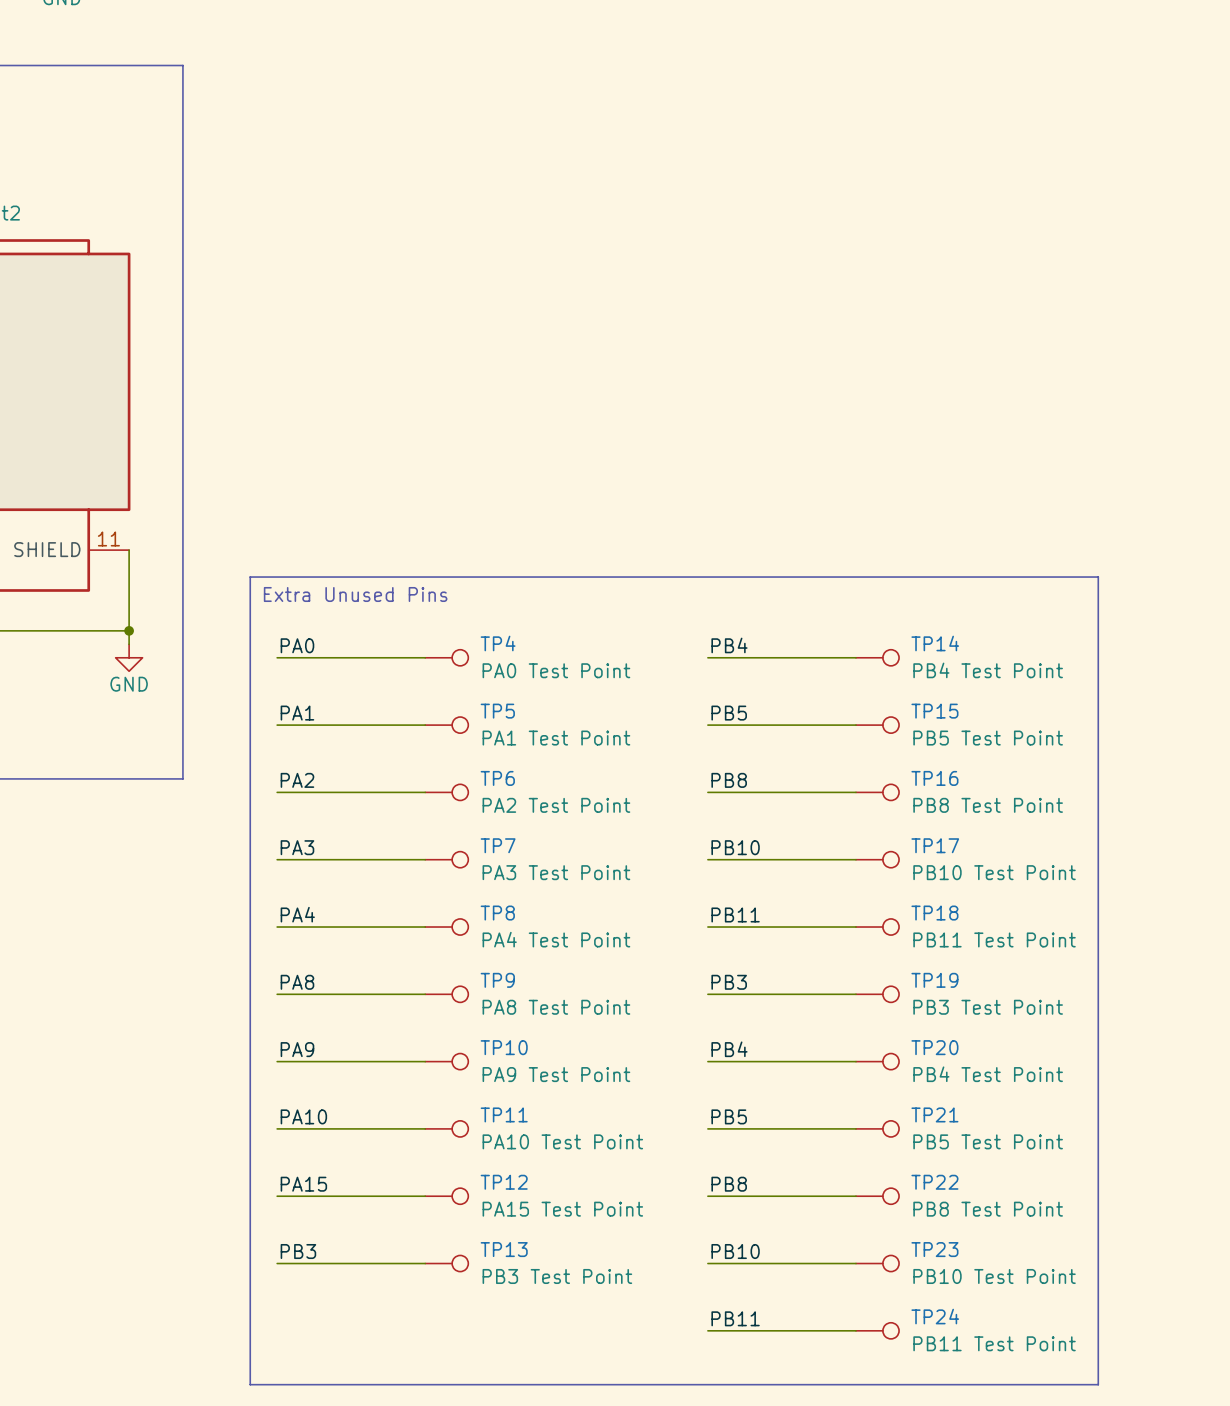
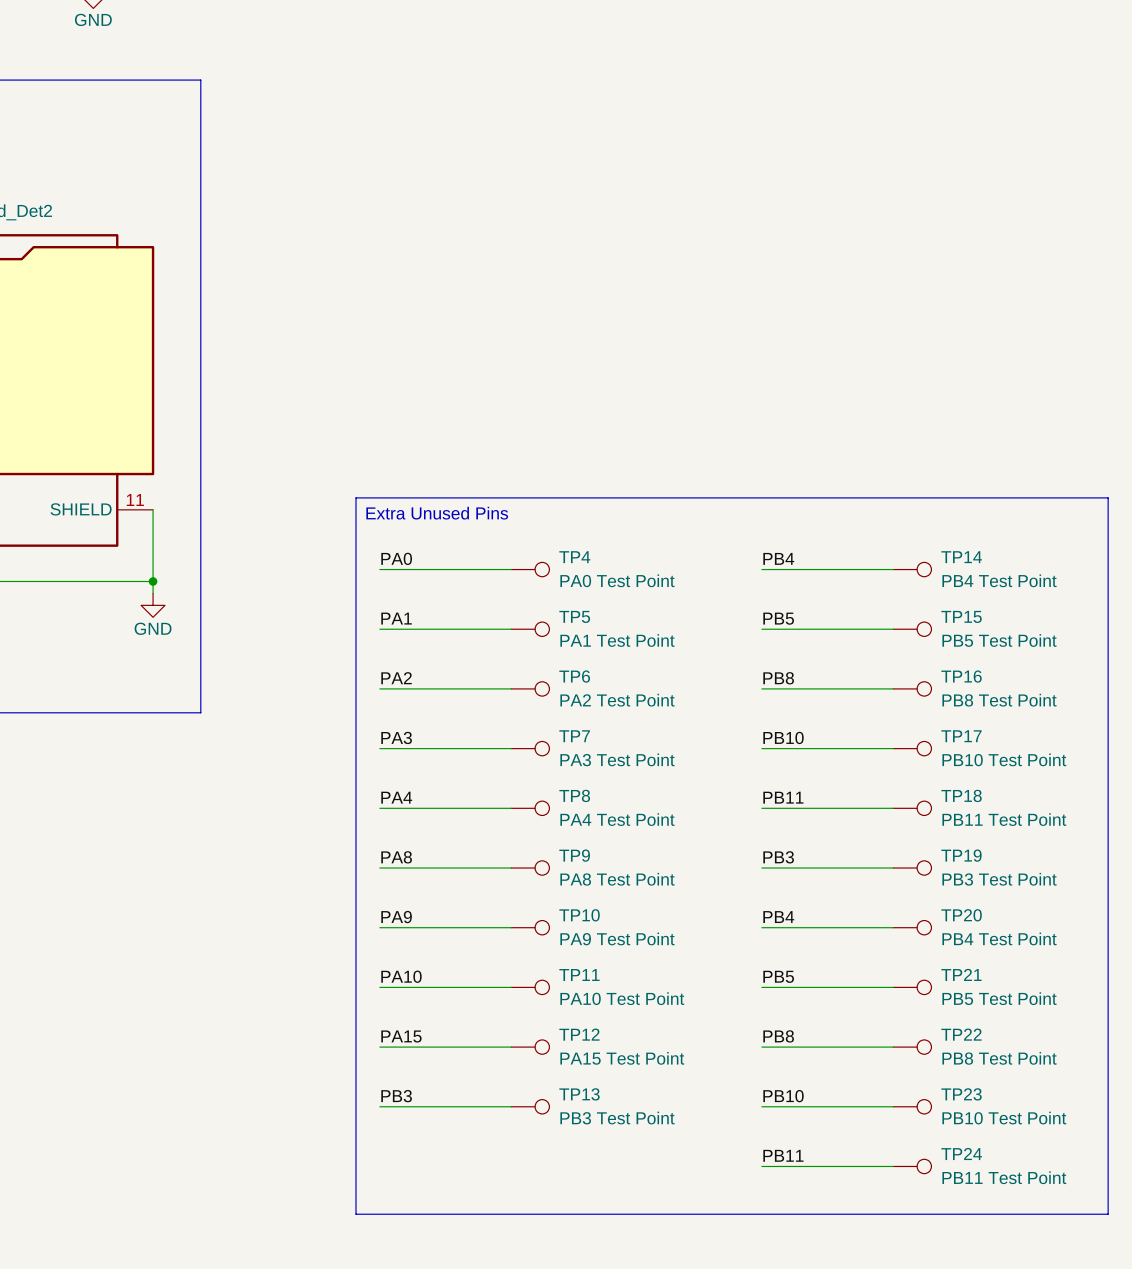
line: (250, 577) (1098, 577) (1098, 1384) (250, 1384) (250, 577) -> (356, 497) (1108, 497) (1108, 1214) (356, 1214) (356, 497)
text position: Extra Unused Pins (355, 594) -> Extra Unused Pins (437, 513)
label position: PA0 (297, 645) -> PA0 (396, 558)
label position: PB4 (729, 645) -> PB4 (778, 558)
wire: (277, 657) (425, 657) -> (379, 569) (511, 569)
TP4 position: (446, 657) -> (530, 569)
wire: (707, 657) (855, 657) -> (761, 569) (893, 569)
TP14 position: (877, 657) -> (912, 569)
label position: PA1 (297, 713) -> PA1 (396, 618)
label position: PB5 (729, 713) -> PB5 (778, 618)
wire: (277, 725) (425, 725) -> (379, 629) (511, 629)
TP5 position: (446, 725) -> (530, 629)
wire: (707, 725) (855, 725) -> (761, 629) (893, 629)
TP15 position: (877, 725) -> (912, 629)
label position: PA2 (297, 780) -> PA2 (396, 678)
label position: PB8 (729, 780) -> PB8 (778, 678)
wire: (277, 792) (425, 792) -> (379, 688) (511, 688)
TP6 position: (446, 792) -> (530, 688)
wire: (707, 792) (855, 792) -> (761, 688) (893, 688)
TP16 position: (877, 792) -> (912, 688)
label position: PA3 (297, 847) -> PA3 (396, 737)
label position: PB10 (735, 847) -> PB10 (783, 737)
wire: (277, 859) (425, 859) -> (379, 748) (511, 748)
TP7 position: (446, 859) -> (530, 748)
wire: (707, 859) (855, 859) -> (761, 748) (893, 748)
TP17 position: (877, 859) -> (912, 748)
label position: PA4 (297, 914) -> PA4 (396, 797)
label position: PB11 (735, 914) -> PB11 (783, 797)
wire: (277, 927) (425, 927) -> (379, 808) (511, 808)
TP8 position: (446, 927) -> (530, 808)
wire: (707, 927) (855, 927) -> (761, 808) (893, 808)
TP18 position: (877, 927) -> (912, 808)
label position: PA8 (297, 982) -> PA8 (396, 857)
label position: PB3 (729, 982) -> PB3 (778, 857)
wire: (277, 994) (425, 994) -> (379, 868) (511, 868)
TP9 position: (446, 994) -> (530, 868)
wire: (707, 994) (855, 994) -> (761, 868) (893, 868)
TP19 position: (877, 994) -> (912, 868)
label position: PA9 (297, 1049) -> PA9 (396, 917)
label position: PB4 (729, 1049) -> PB4 (778, 917)
wire: (277, 1061) (425, 1061) -> (379, 927) (511, 927)
TP10 position: (446, 1061) -> (530, 927)
wire: (707, 1061) (855, 1061) -> (761, 927) (893, 927)
TP20 position: (877, 1061) -> (912, 927)
label position: PA10 (303, 1116) -> PA10 (401, 976)
label position: PB5 (729, 1116) -> PB5 (778, 976)
wire: (277, 1128) (425, 1128) -> (379, 987) (511, 987)
TP11 position: (446, 1128) -> (530, 987)
wire: (707, 1128) (855, 1128) -> (761, 987) (893, 987)
TP21 position: (877, 1128) -> (912, 987)
label position: PA15 (303, 1184) -> PA15 (401, 1036)
label position: PB8 (729, 1184) -> PB8 (778, 1036)
wire: (277, 1196) (425, 1196) -> (379, 1047) (511, 1047)
TP12 position: (446, 1196) -> (530, 1047)
wire: (707, 1196) (855, 1196) -> (761, 1047) (893, 1047)
TP22 position: (877, 1196) -> (912, 1047)
label position: PB3 (298, 1251) -> PB3 (396, 1096)
label position: PB10 (735, 1251) -> PB10 (783, 1096)
wire: (277, 1263) (425, 1263) -> (379, 1106) (511, 1106)
TP13 position: (446, 1263) -> (530, 1106)
wire: (707, 1263) (855, 1263) -> (761, 1106) (893, 1106)
TP23 position: (877, 1263) -> (912, 1106)
label position: PB11 (735, 1318) -> PB11 (783, 1155)
wire: (707, 1330) (855, 1330) -> (761, 1166) (893, 1166)
TP24 position: (877, 1330) -> (912, 1166)

